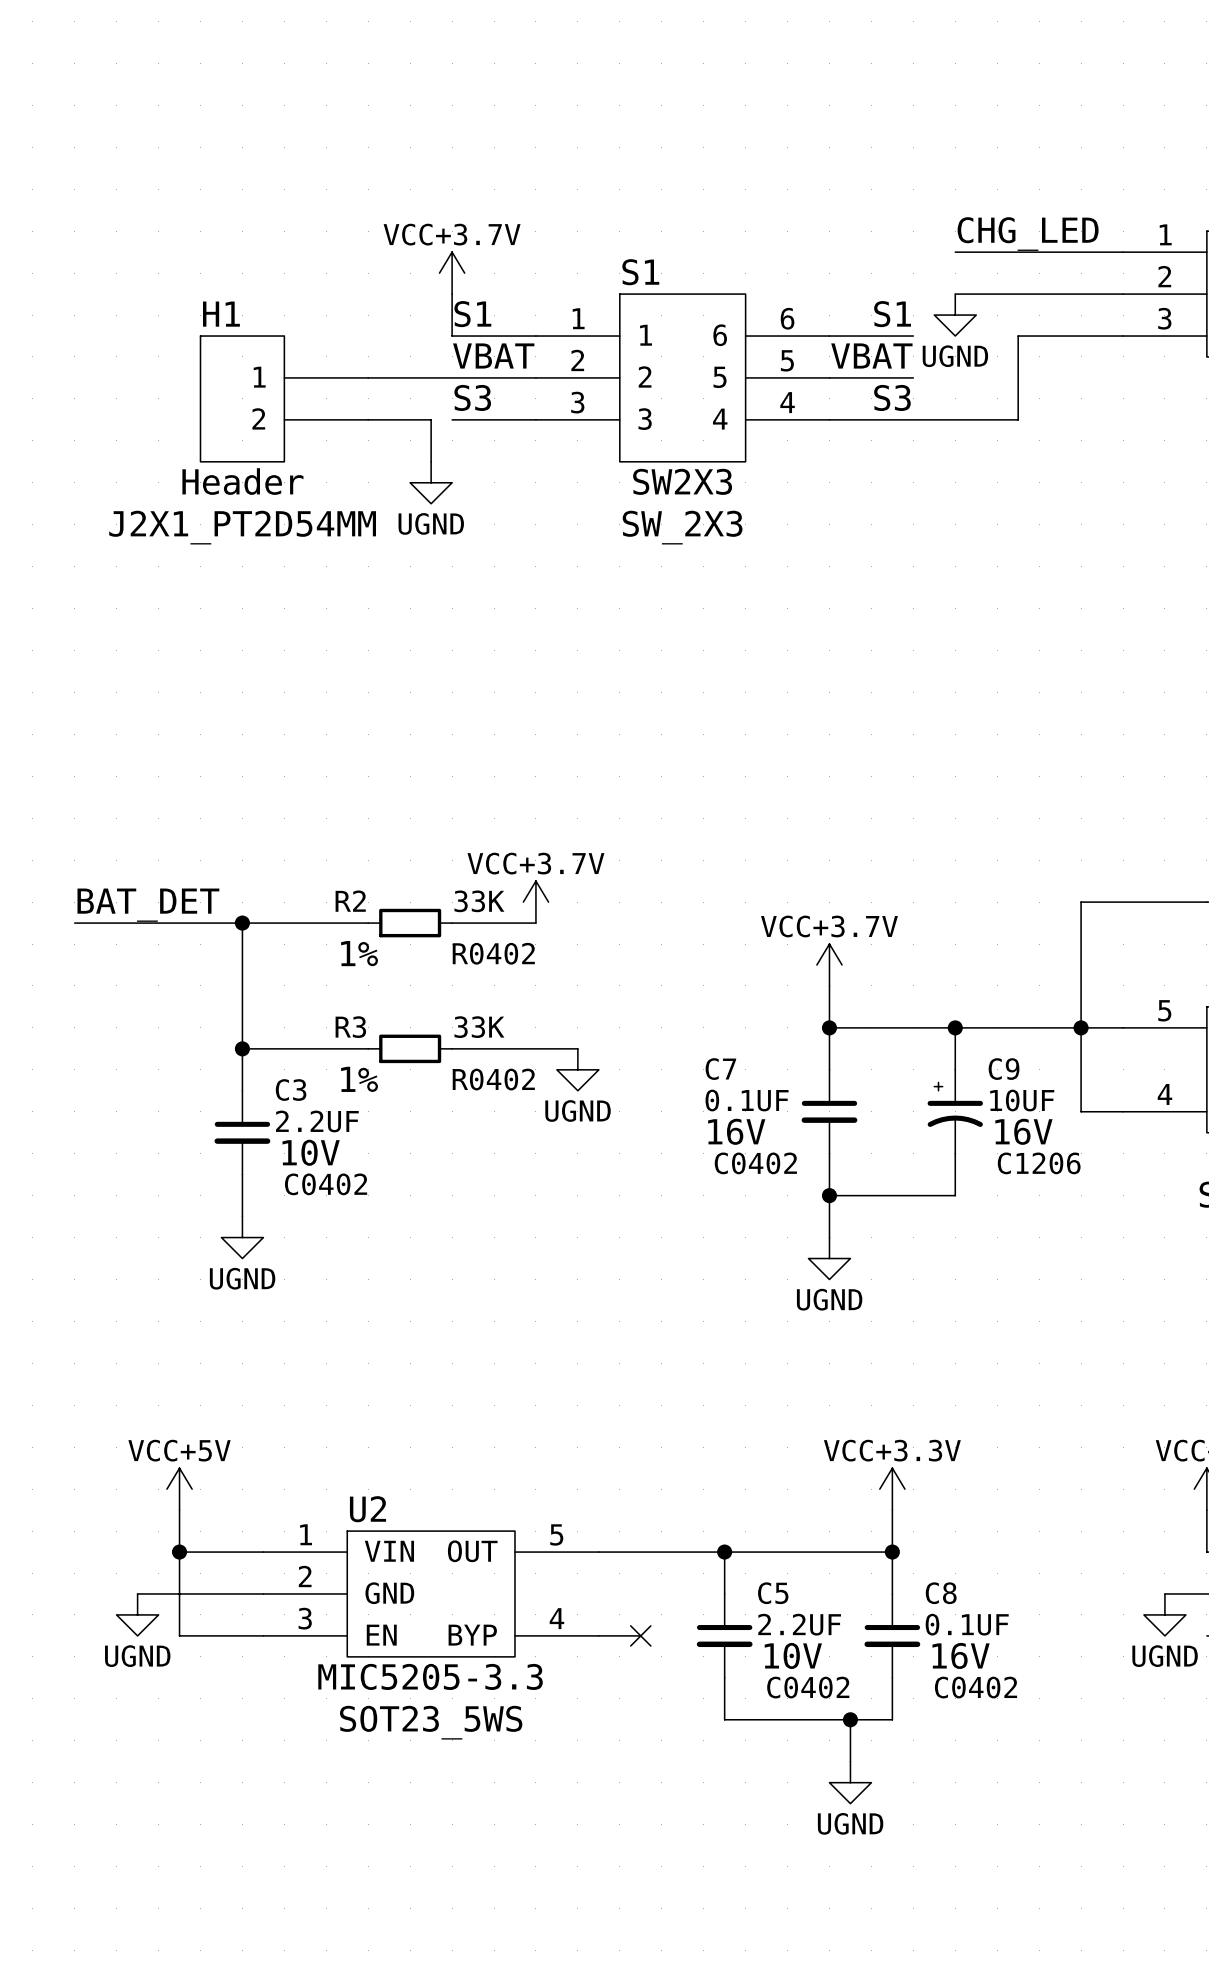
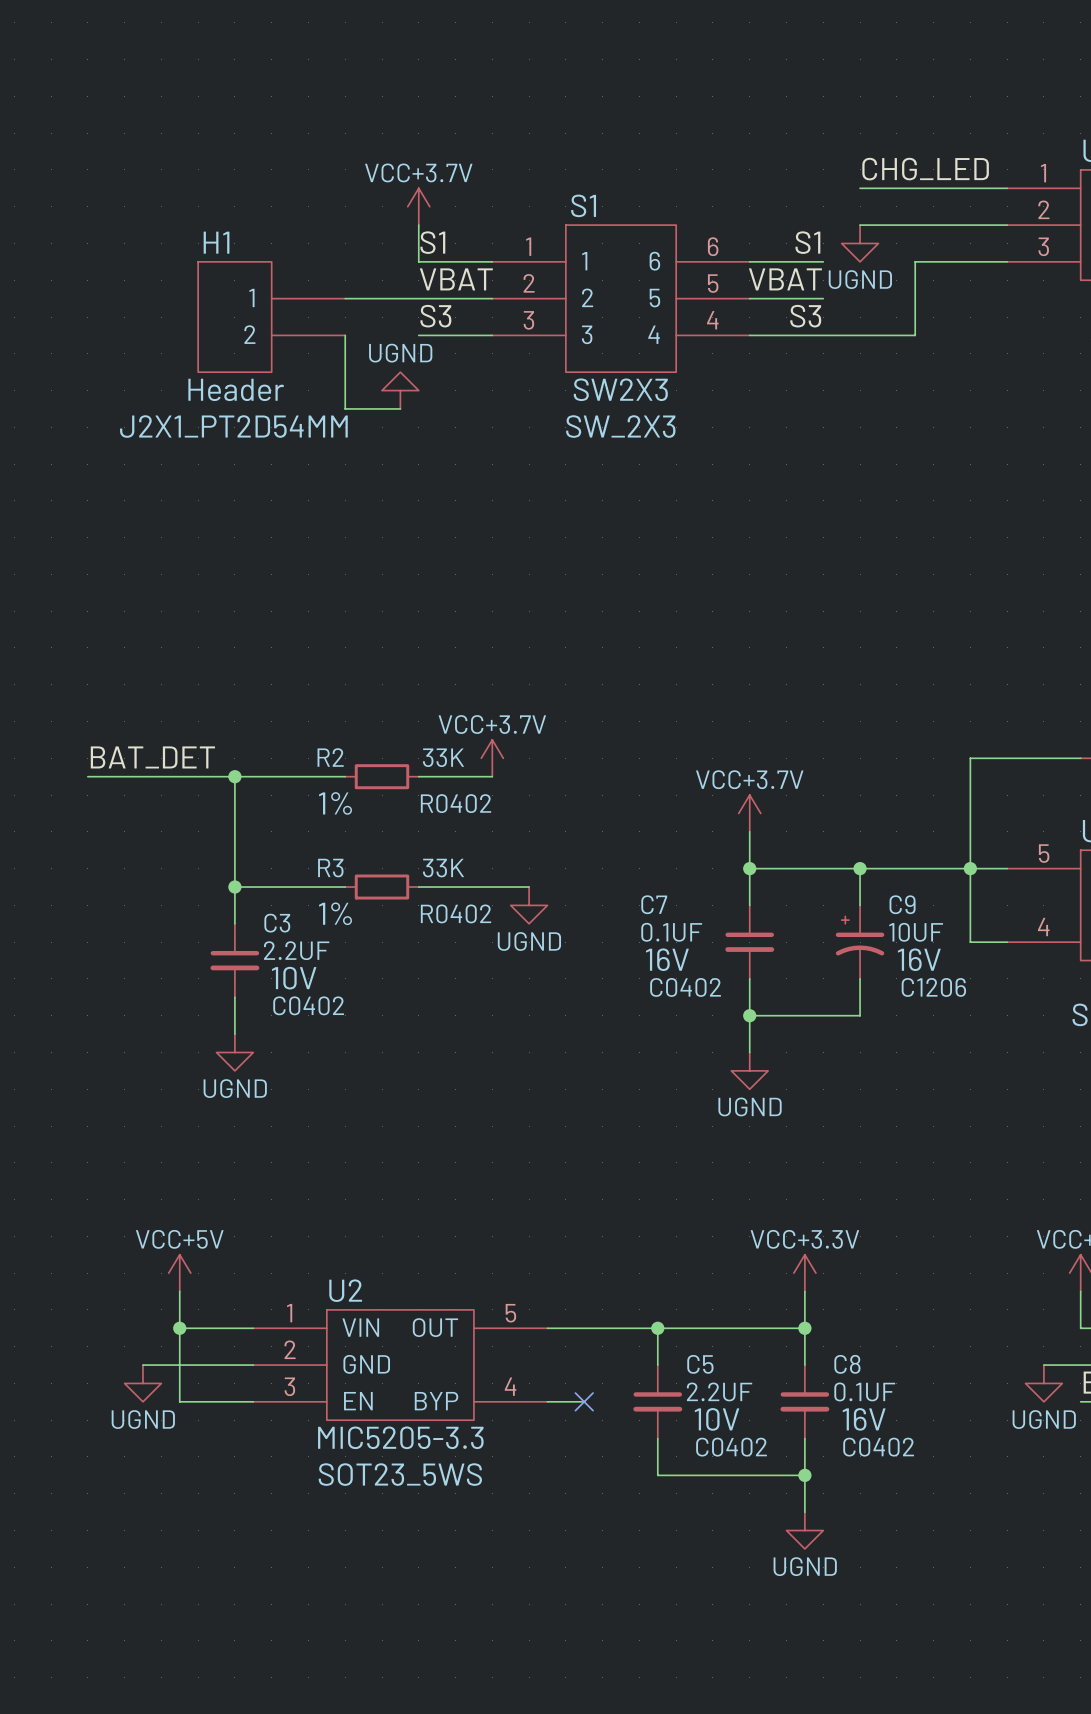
wire: (368, 419) (431, 419) (431, 461) -> (345, 335) (345, 408) (400, 408)
power symbol rotation: 0° (431, 482) -> 180° (400, 390)
wire: (850, 1719) (850, 1761) -> (804, 1475) (804, 1512)
junction position: (850, 1719) -> (804, 1475)
power symbol position: UGND (850, 1782) -> UGND (804, 1530)

